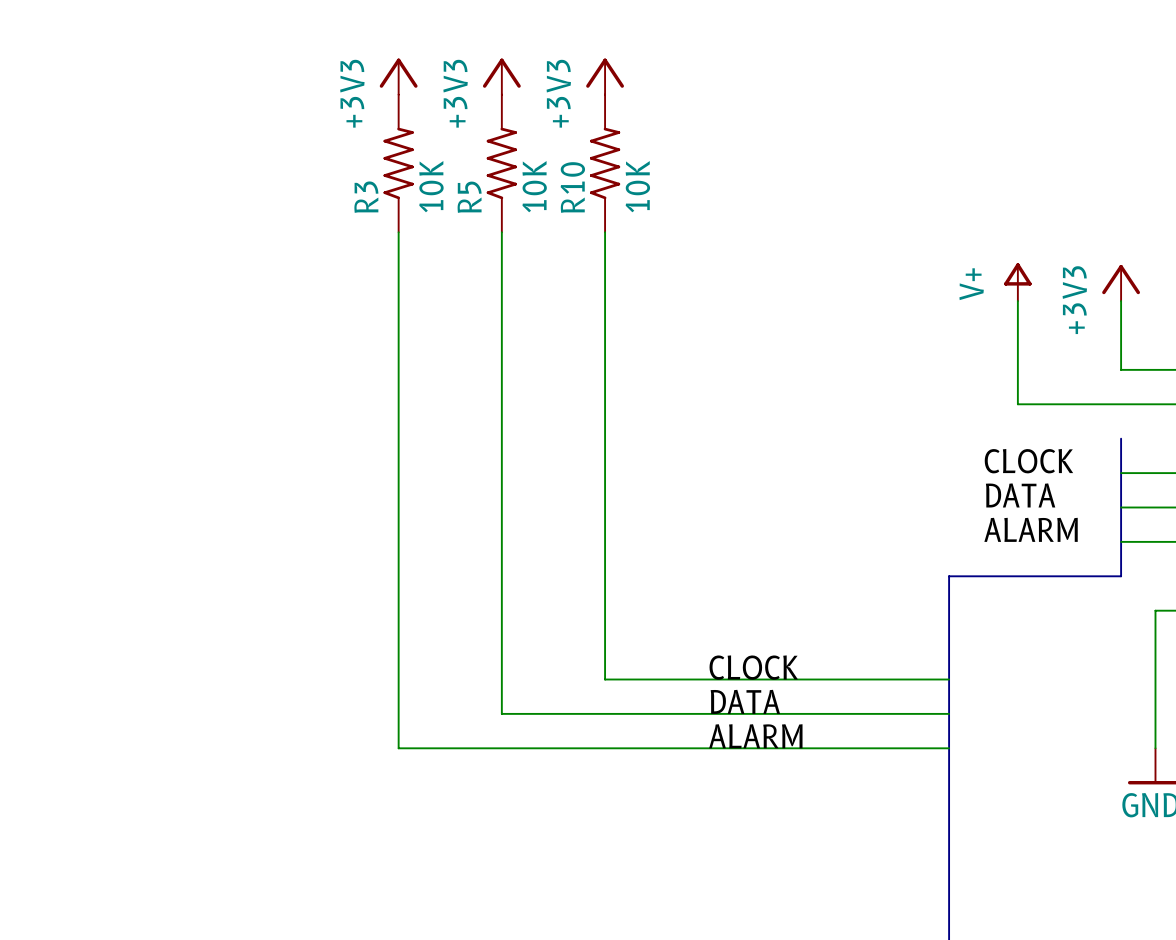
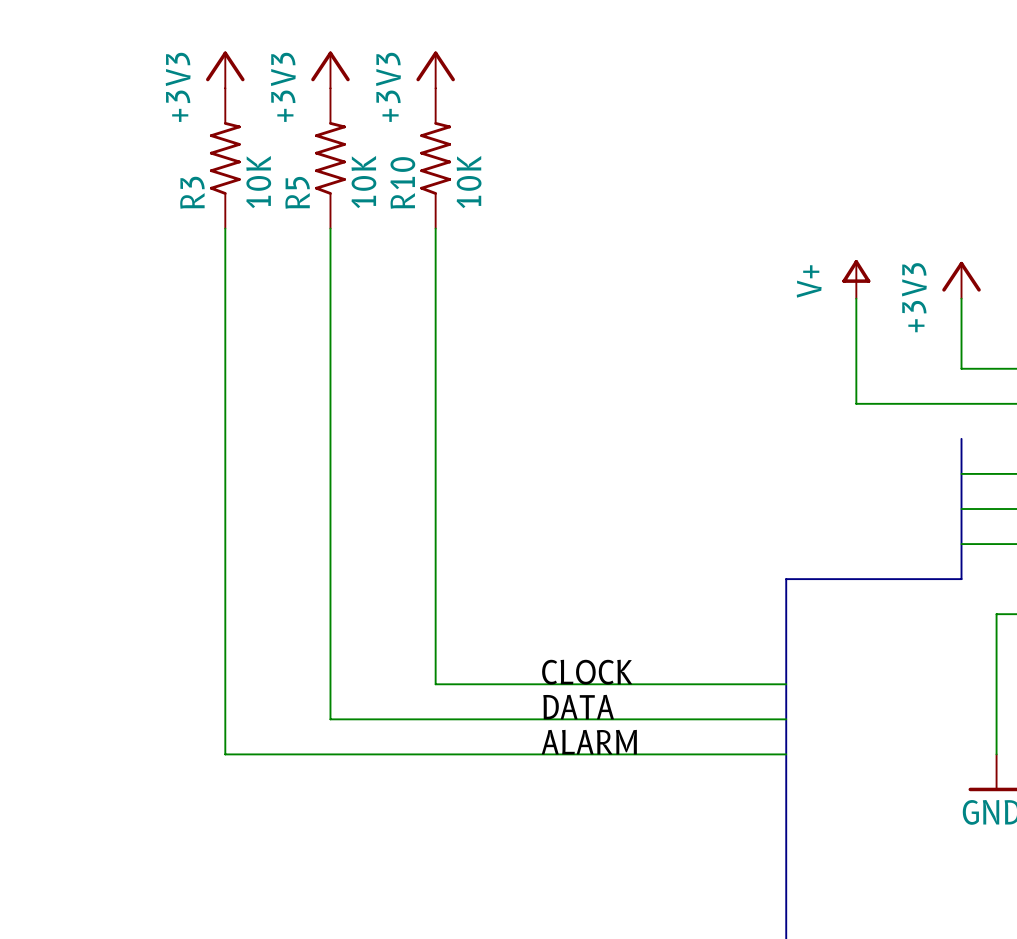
label: CLOCK (1028, 461) -> none
label: DATA (1020, 495) -> none
label: ALARM (1031, 529) -> none

